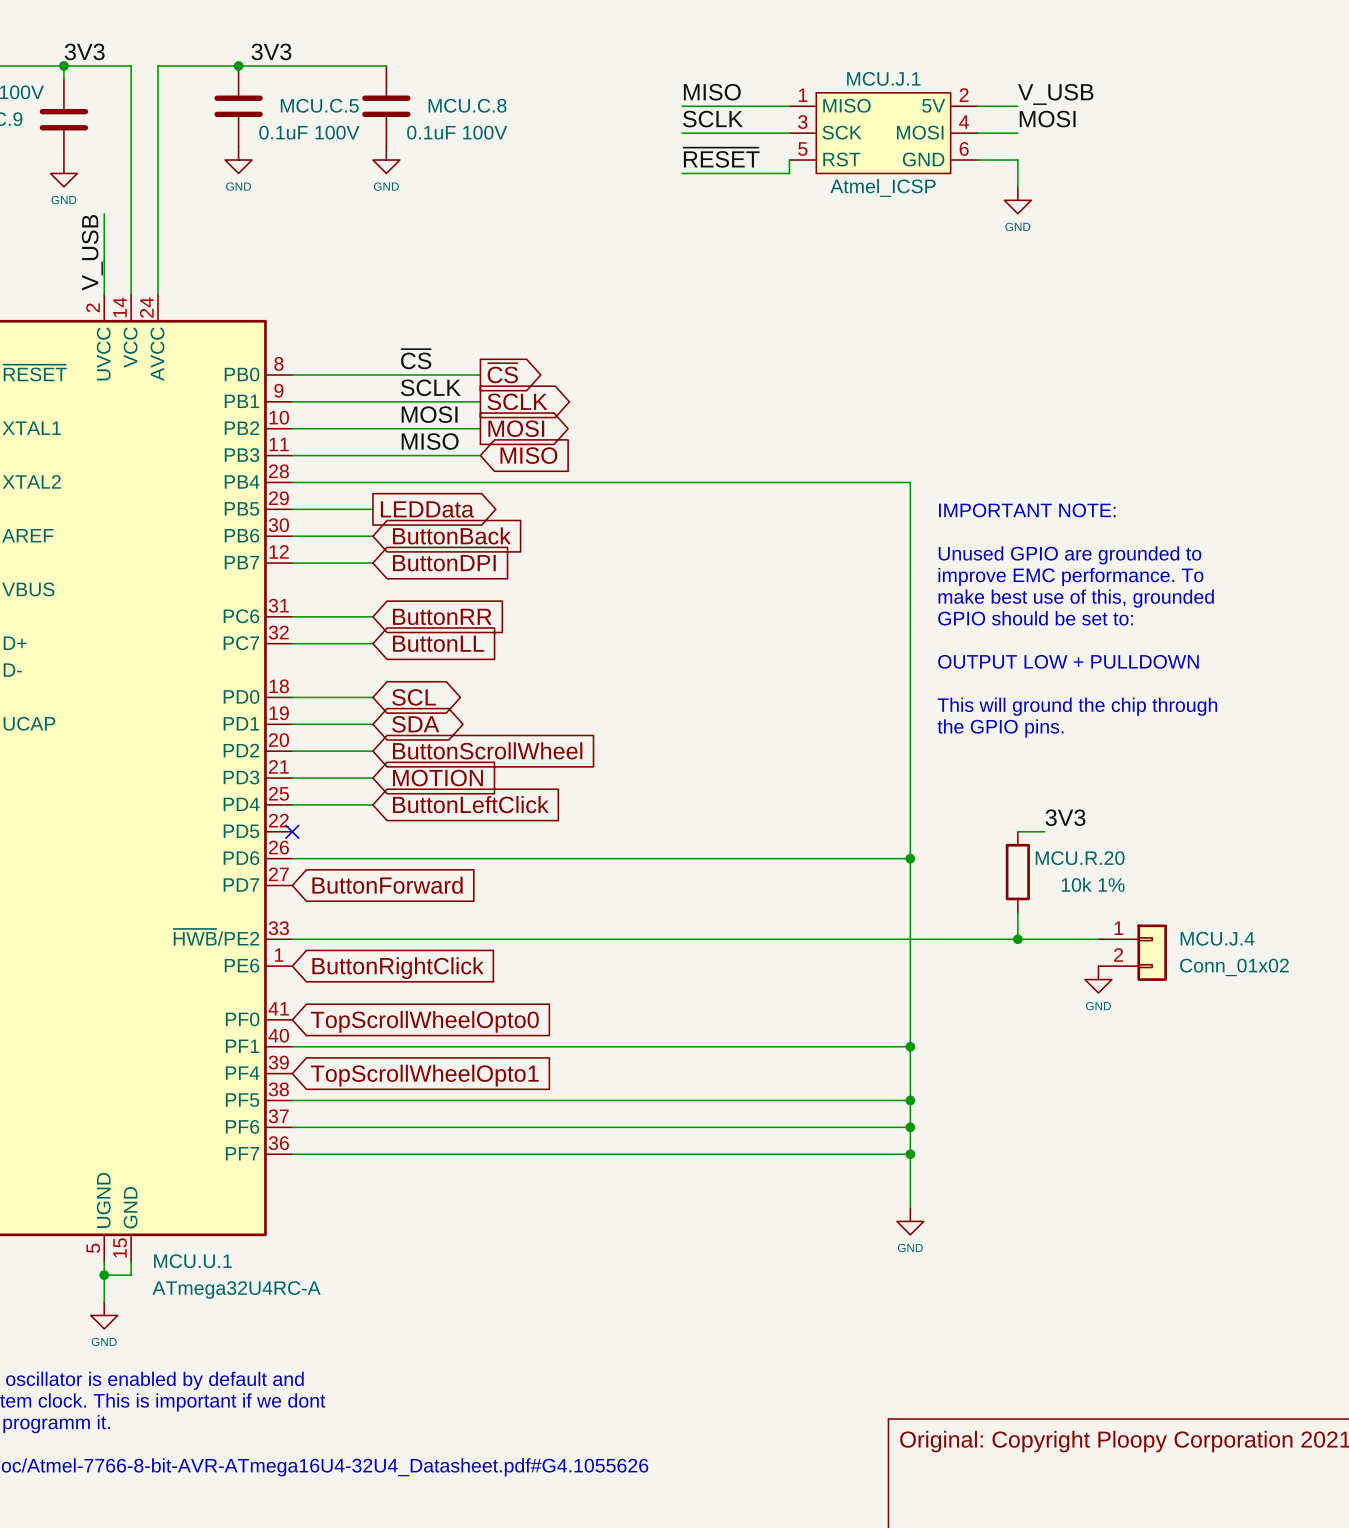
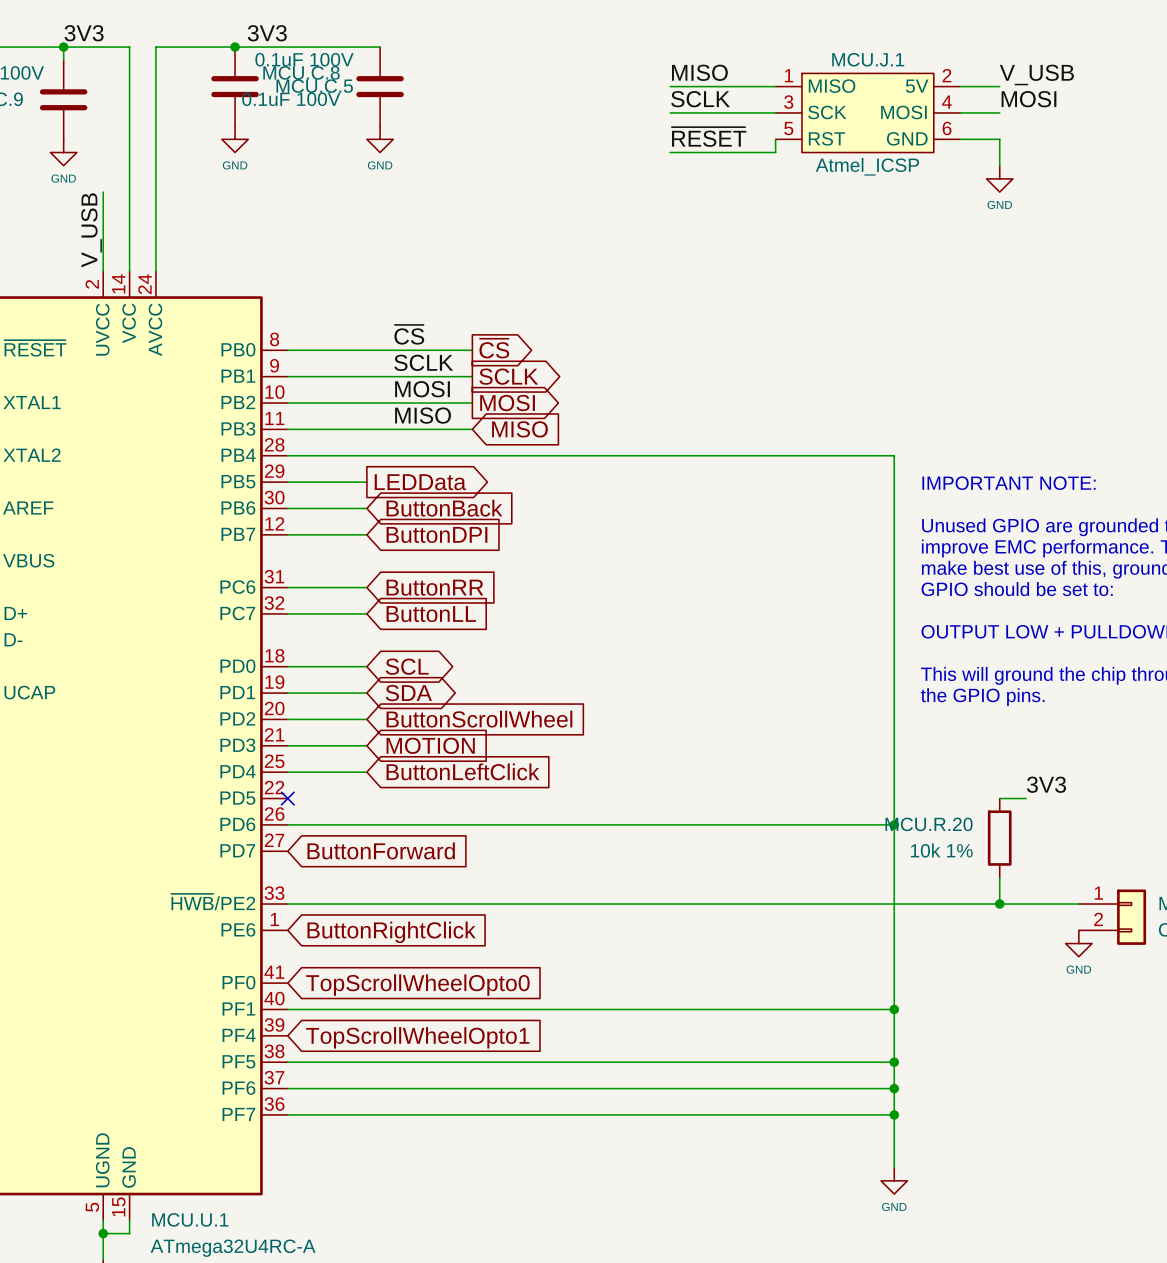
MCU.C.8 name position: MCU.C.8 (467, 105) -> MCU.C.8 (301, 72)
MCU.C.5 value position: 0.1uF 100V (309, 132) -> 0.1uF 100V (304, 59)
MCU.C.8 value position: 0.1uF 100V (457, 132) -> 0.1uF 100V (291, 99)
MCU.R.20 name position: MCU.R.20 (1080, 858) -> MCU.R.20 (929, 824)
MCU.R.20 value position: 10k 1% (1093, 884) -> 10k 1% (941, 850)

